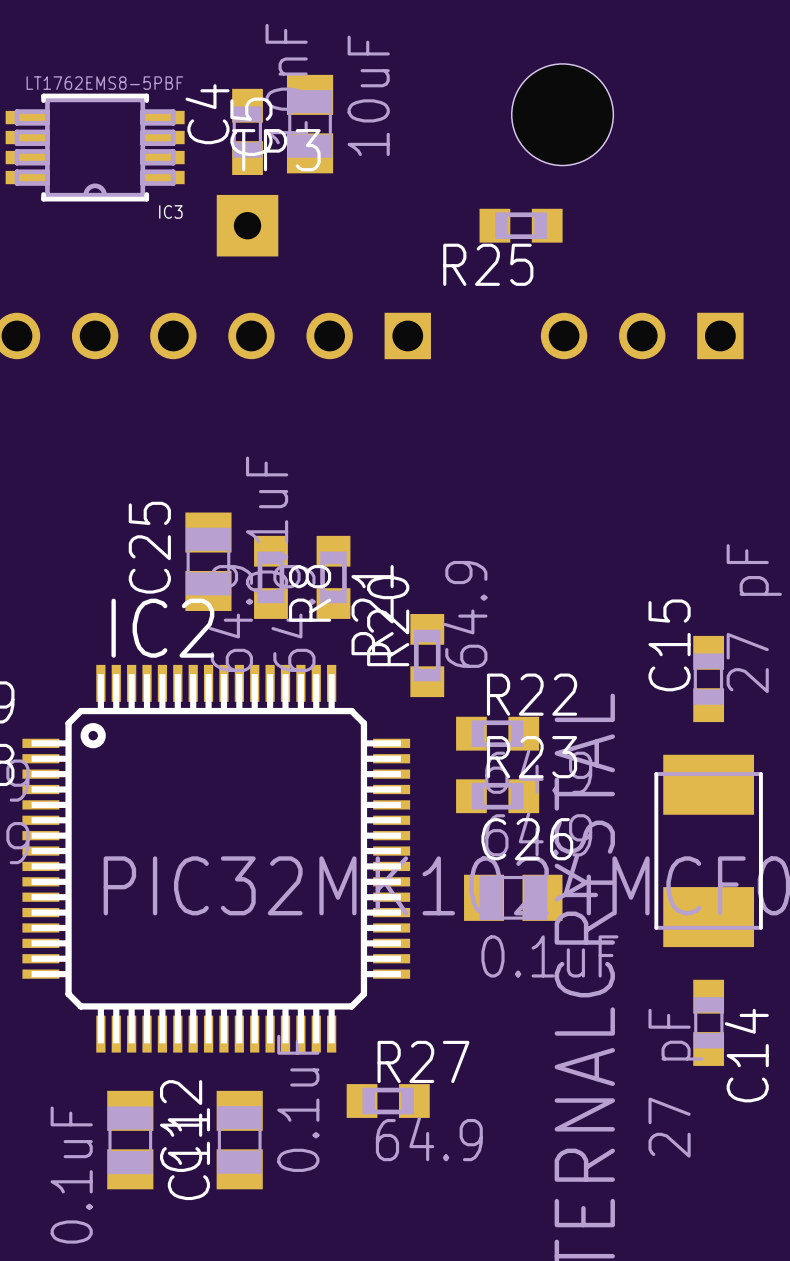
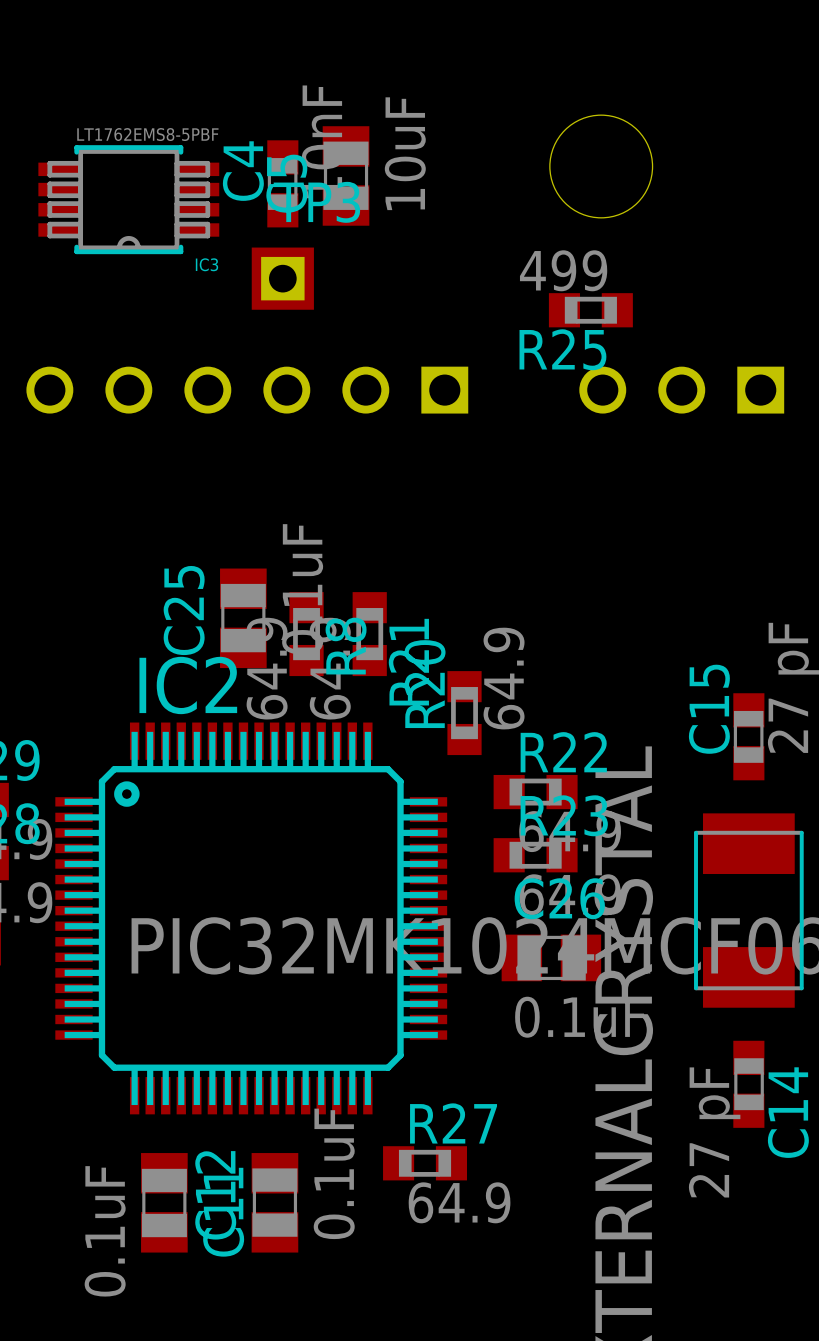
R25 value: none -> 499 (563, 270)
R25 position: (521, 225) -> (590, 310)

